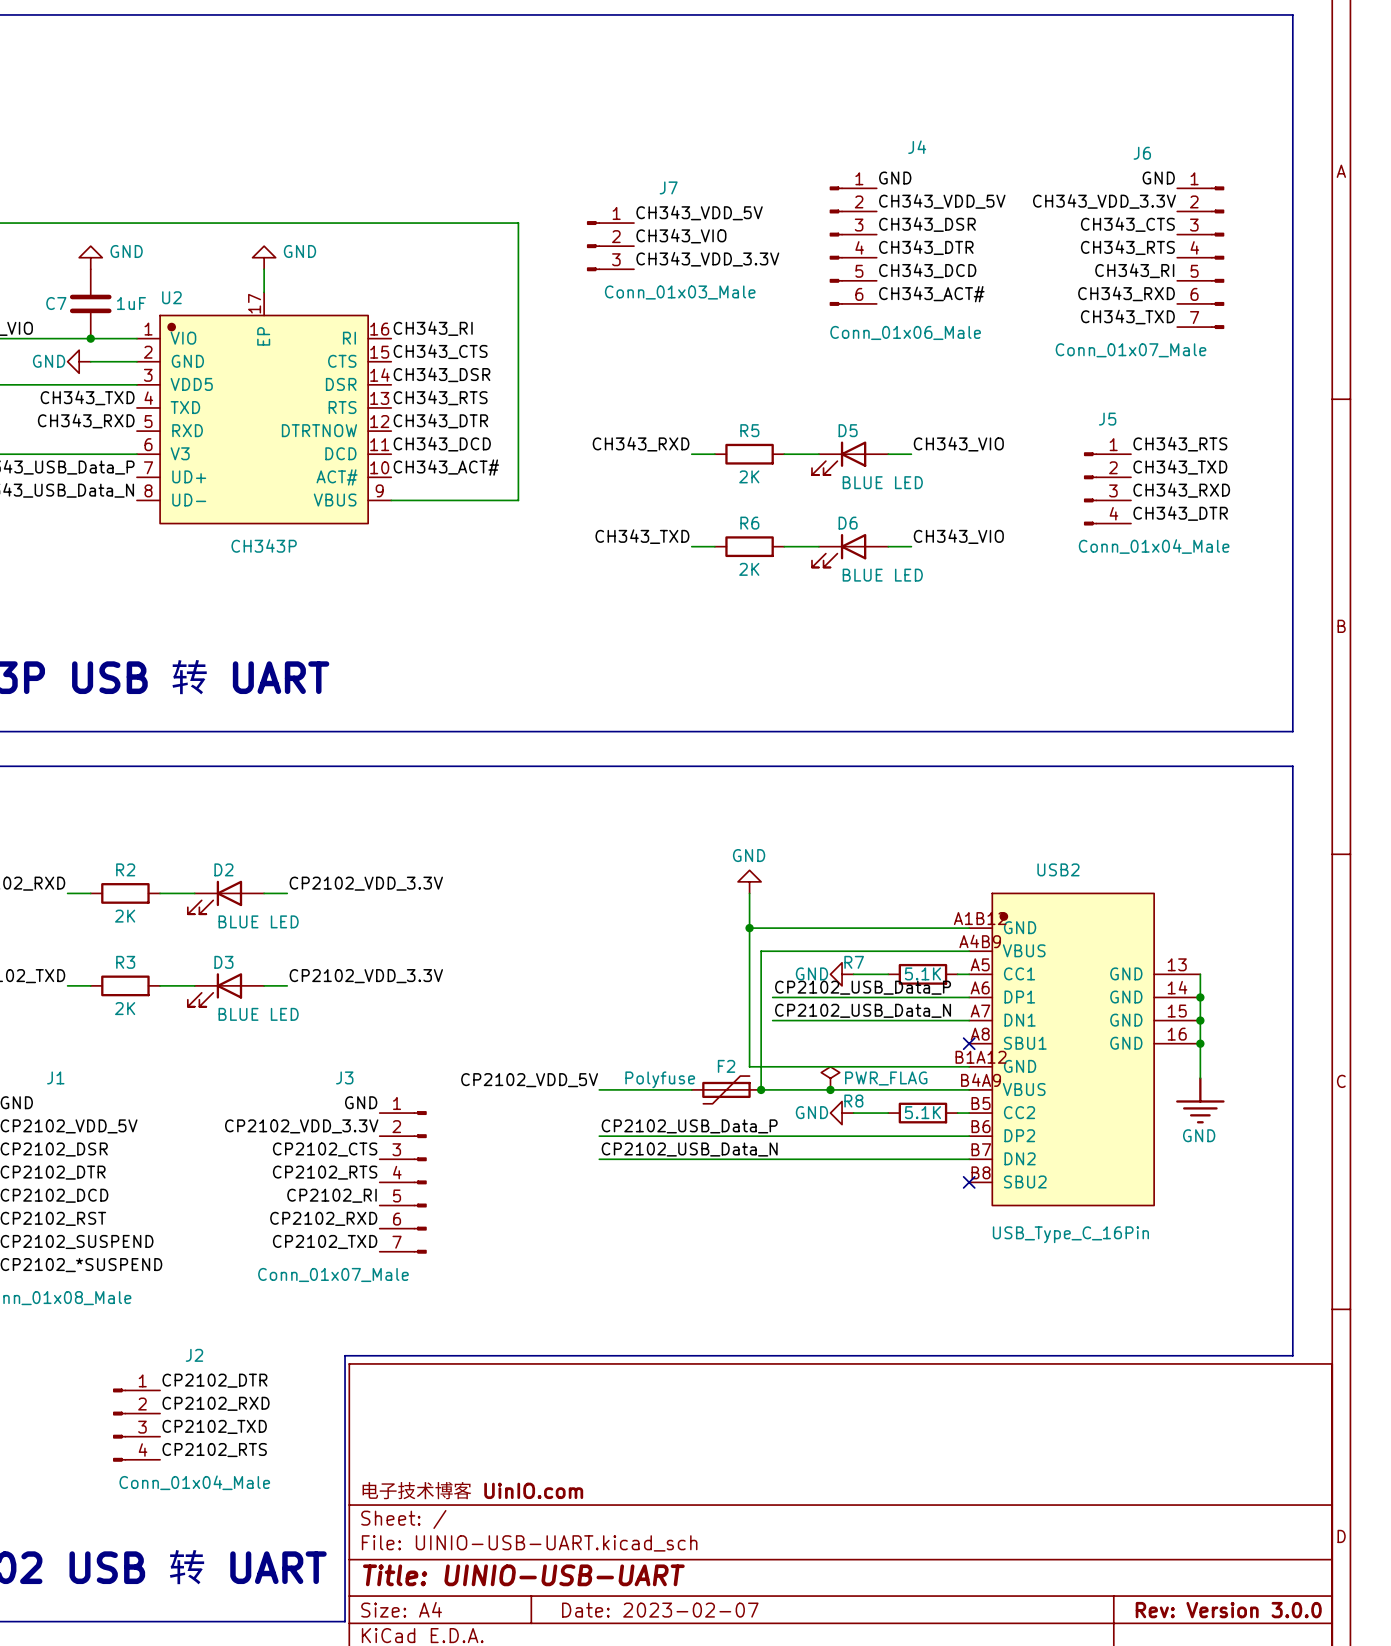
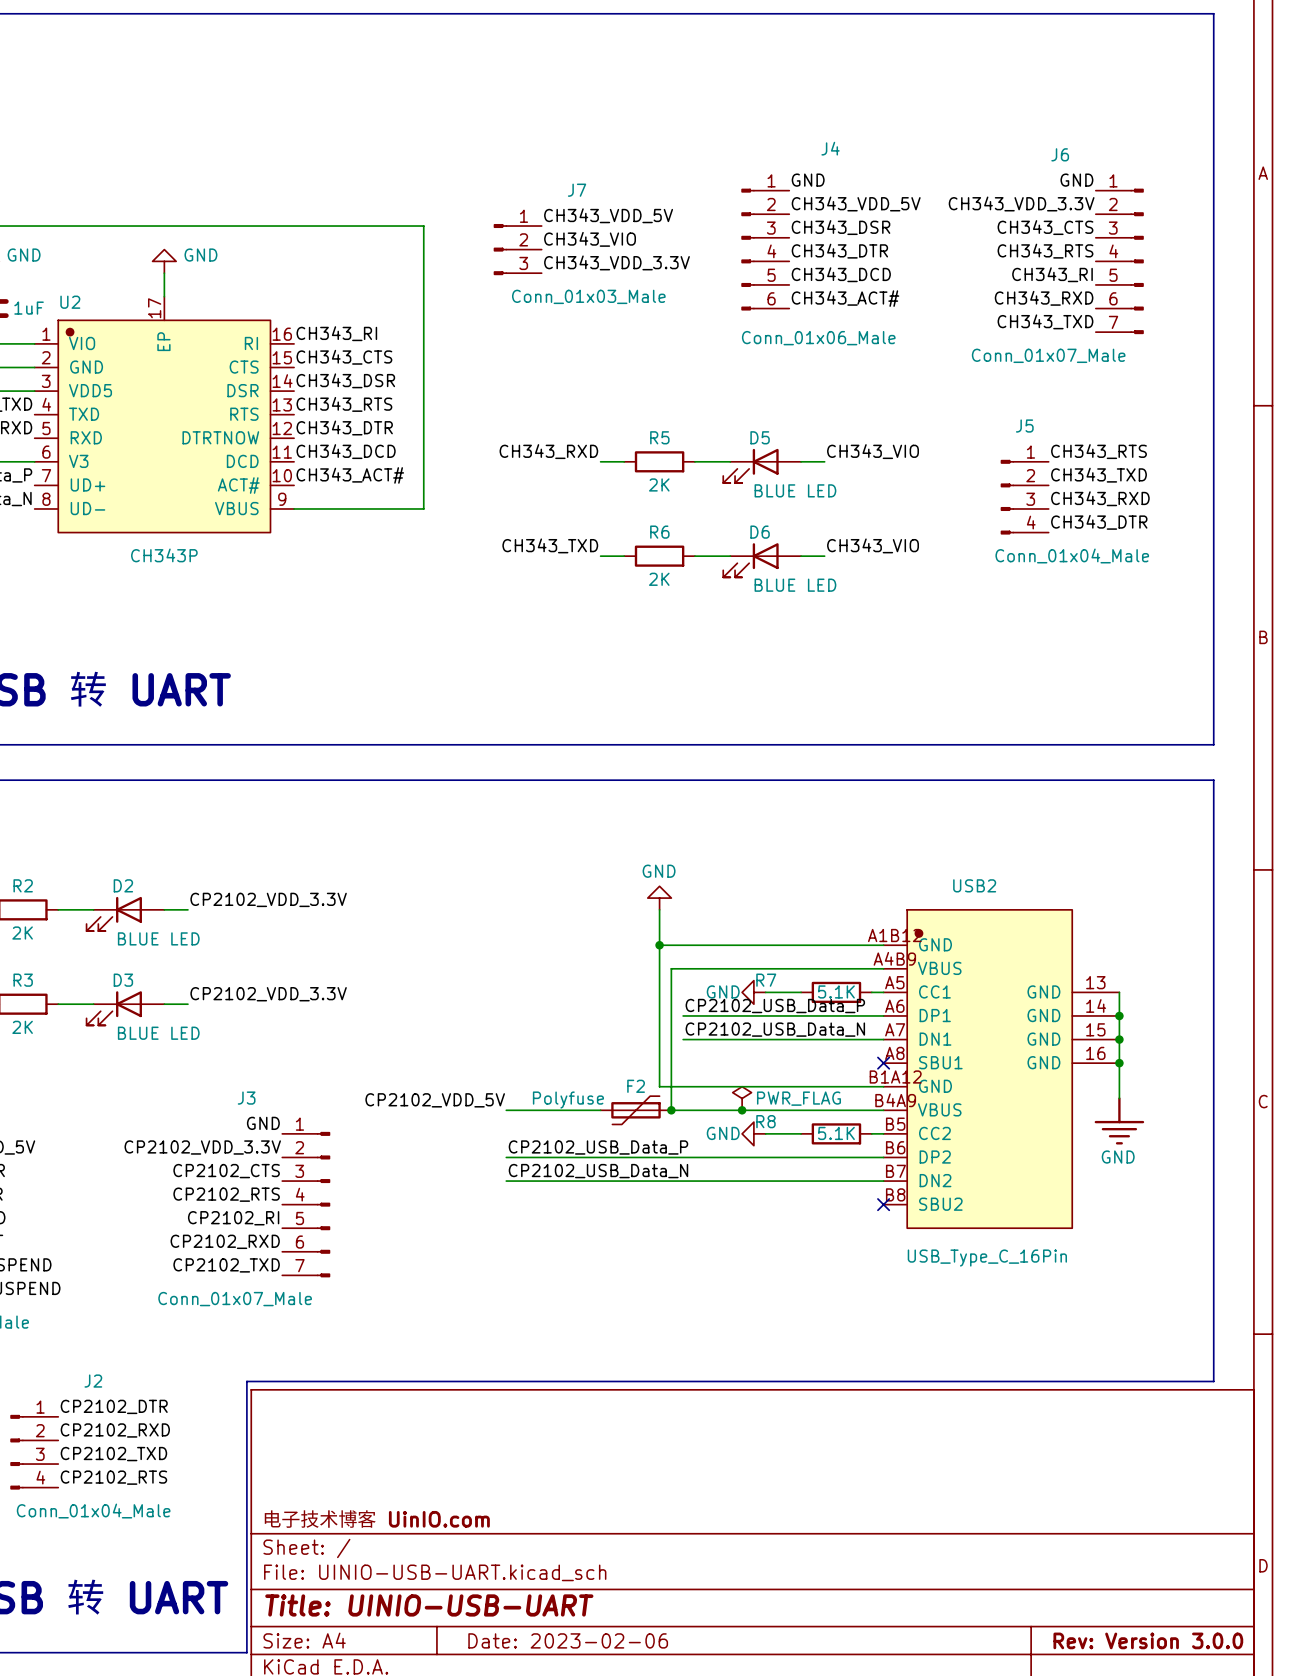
title block: Date: 2023-02-07 (660, 1610) -> Date: 2023-02-06 (568, 1640)

